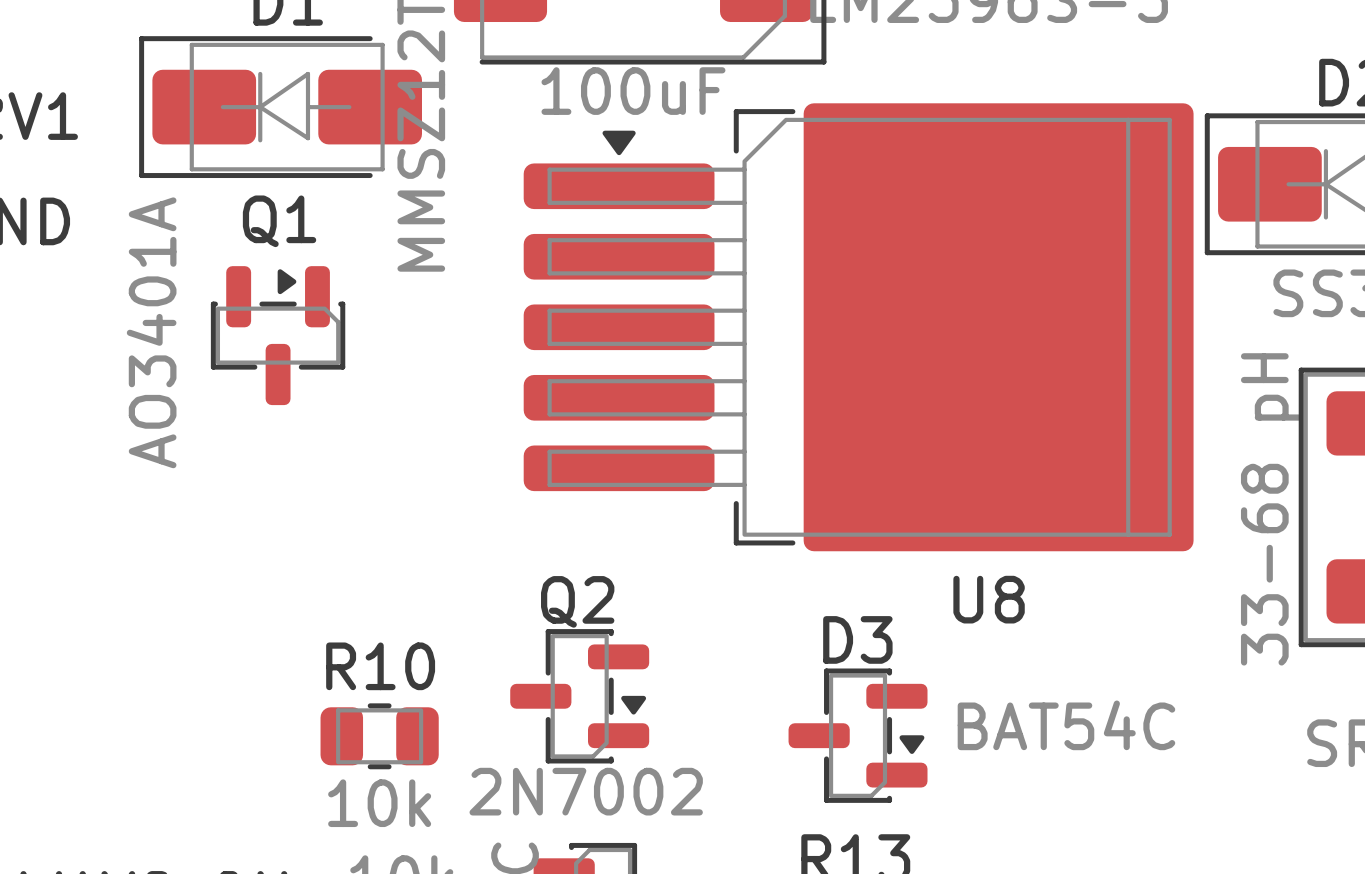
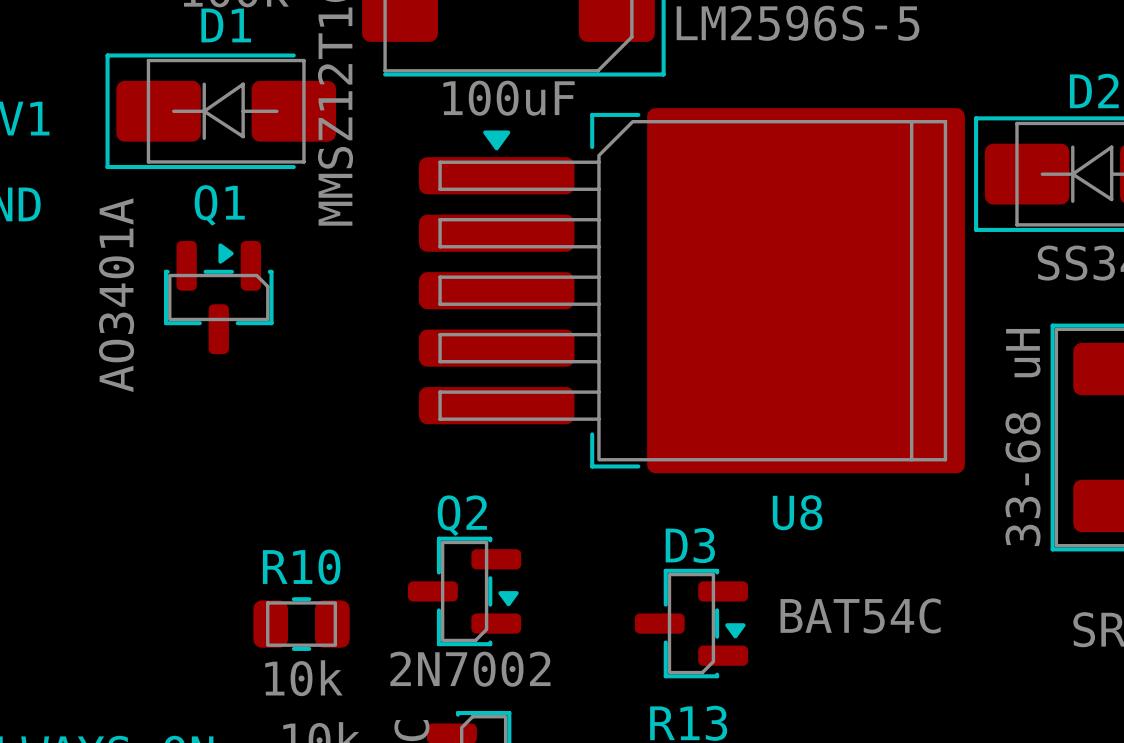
part value: 33-68 pH (1271, 509) -> 33-68 uH (1022, 437)

